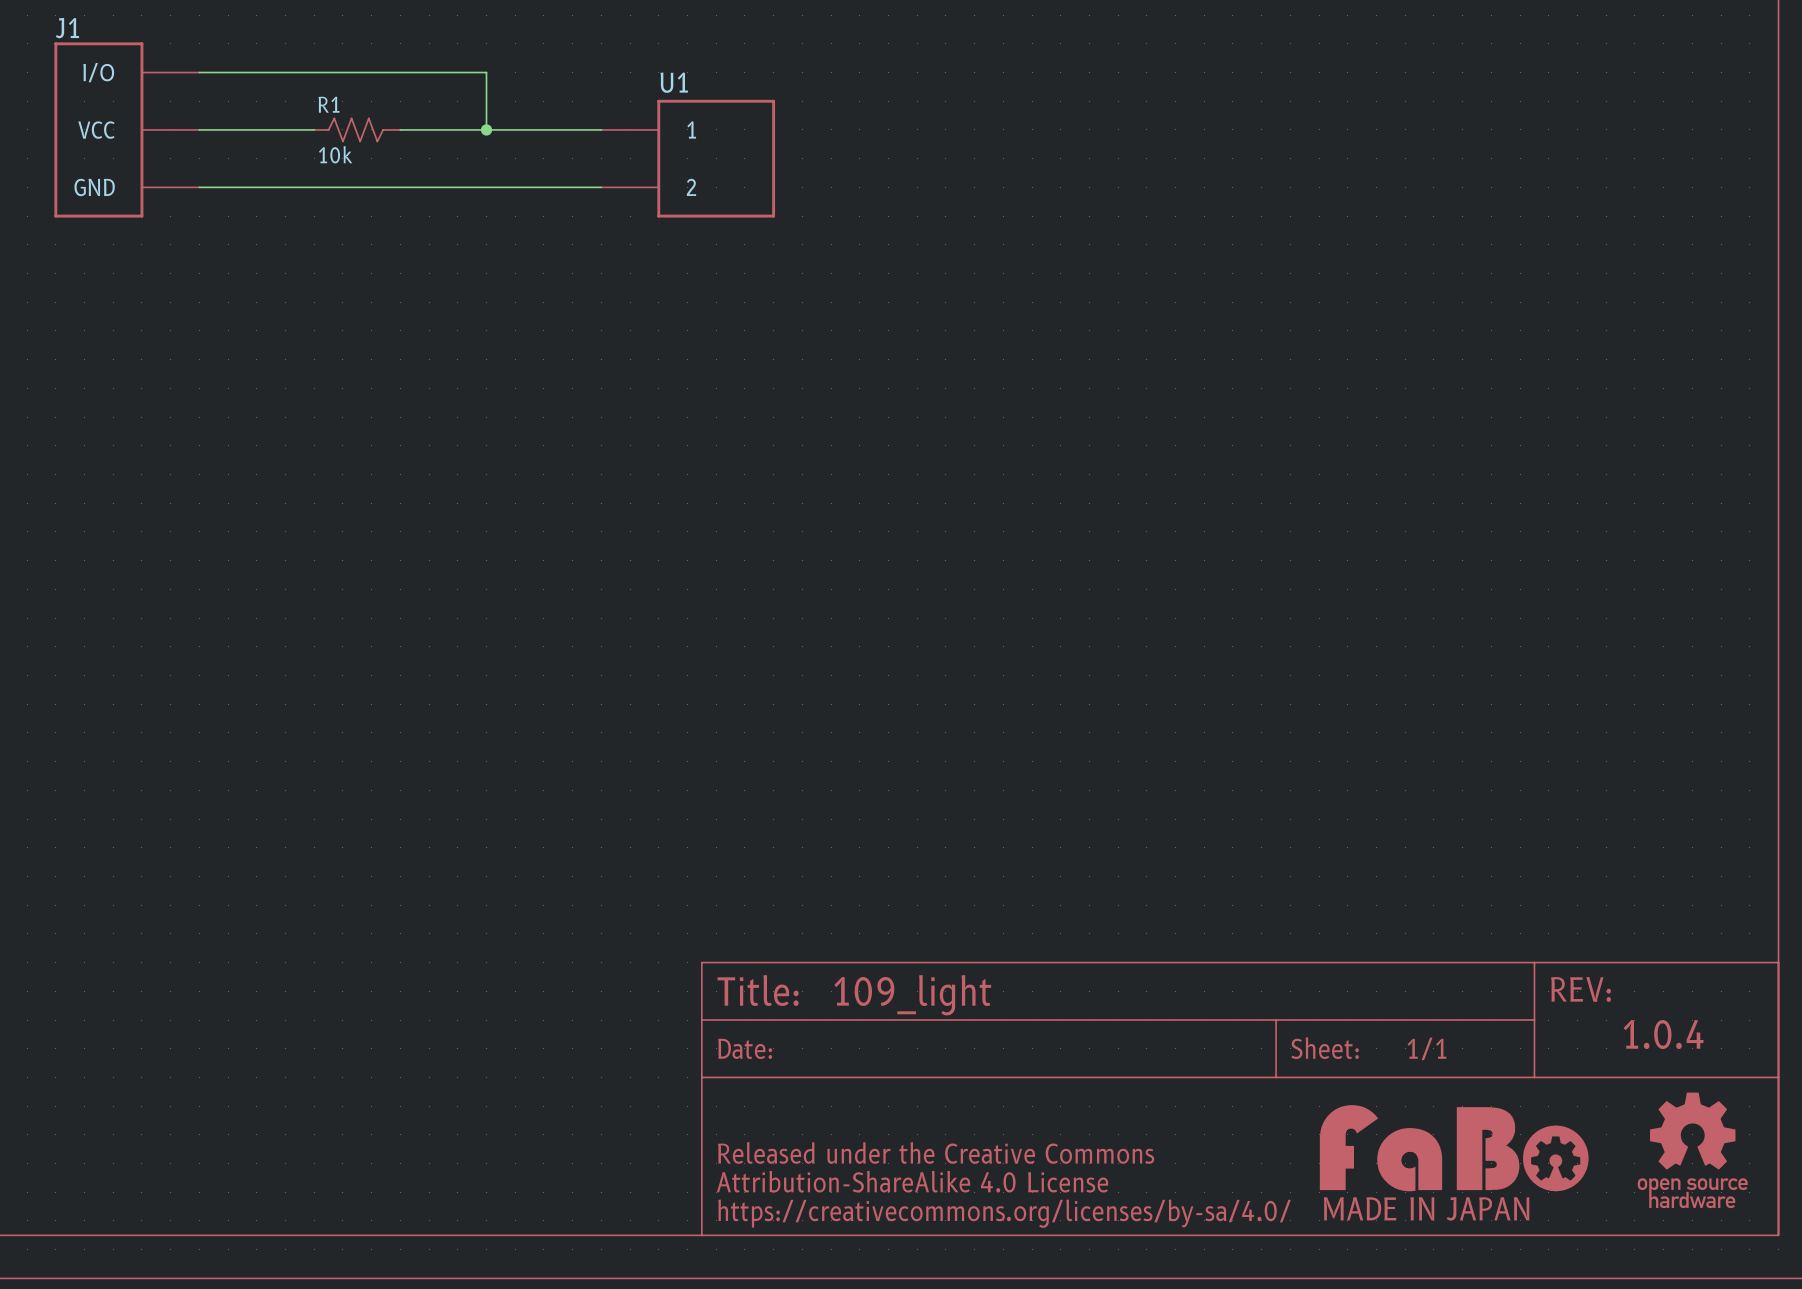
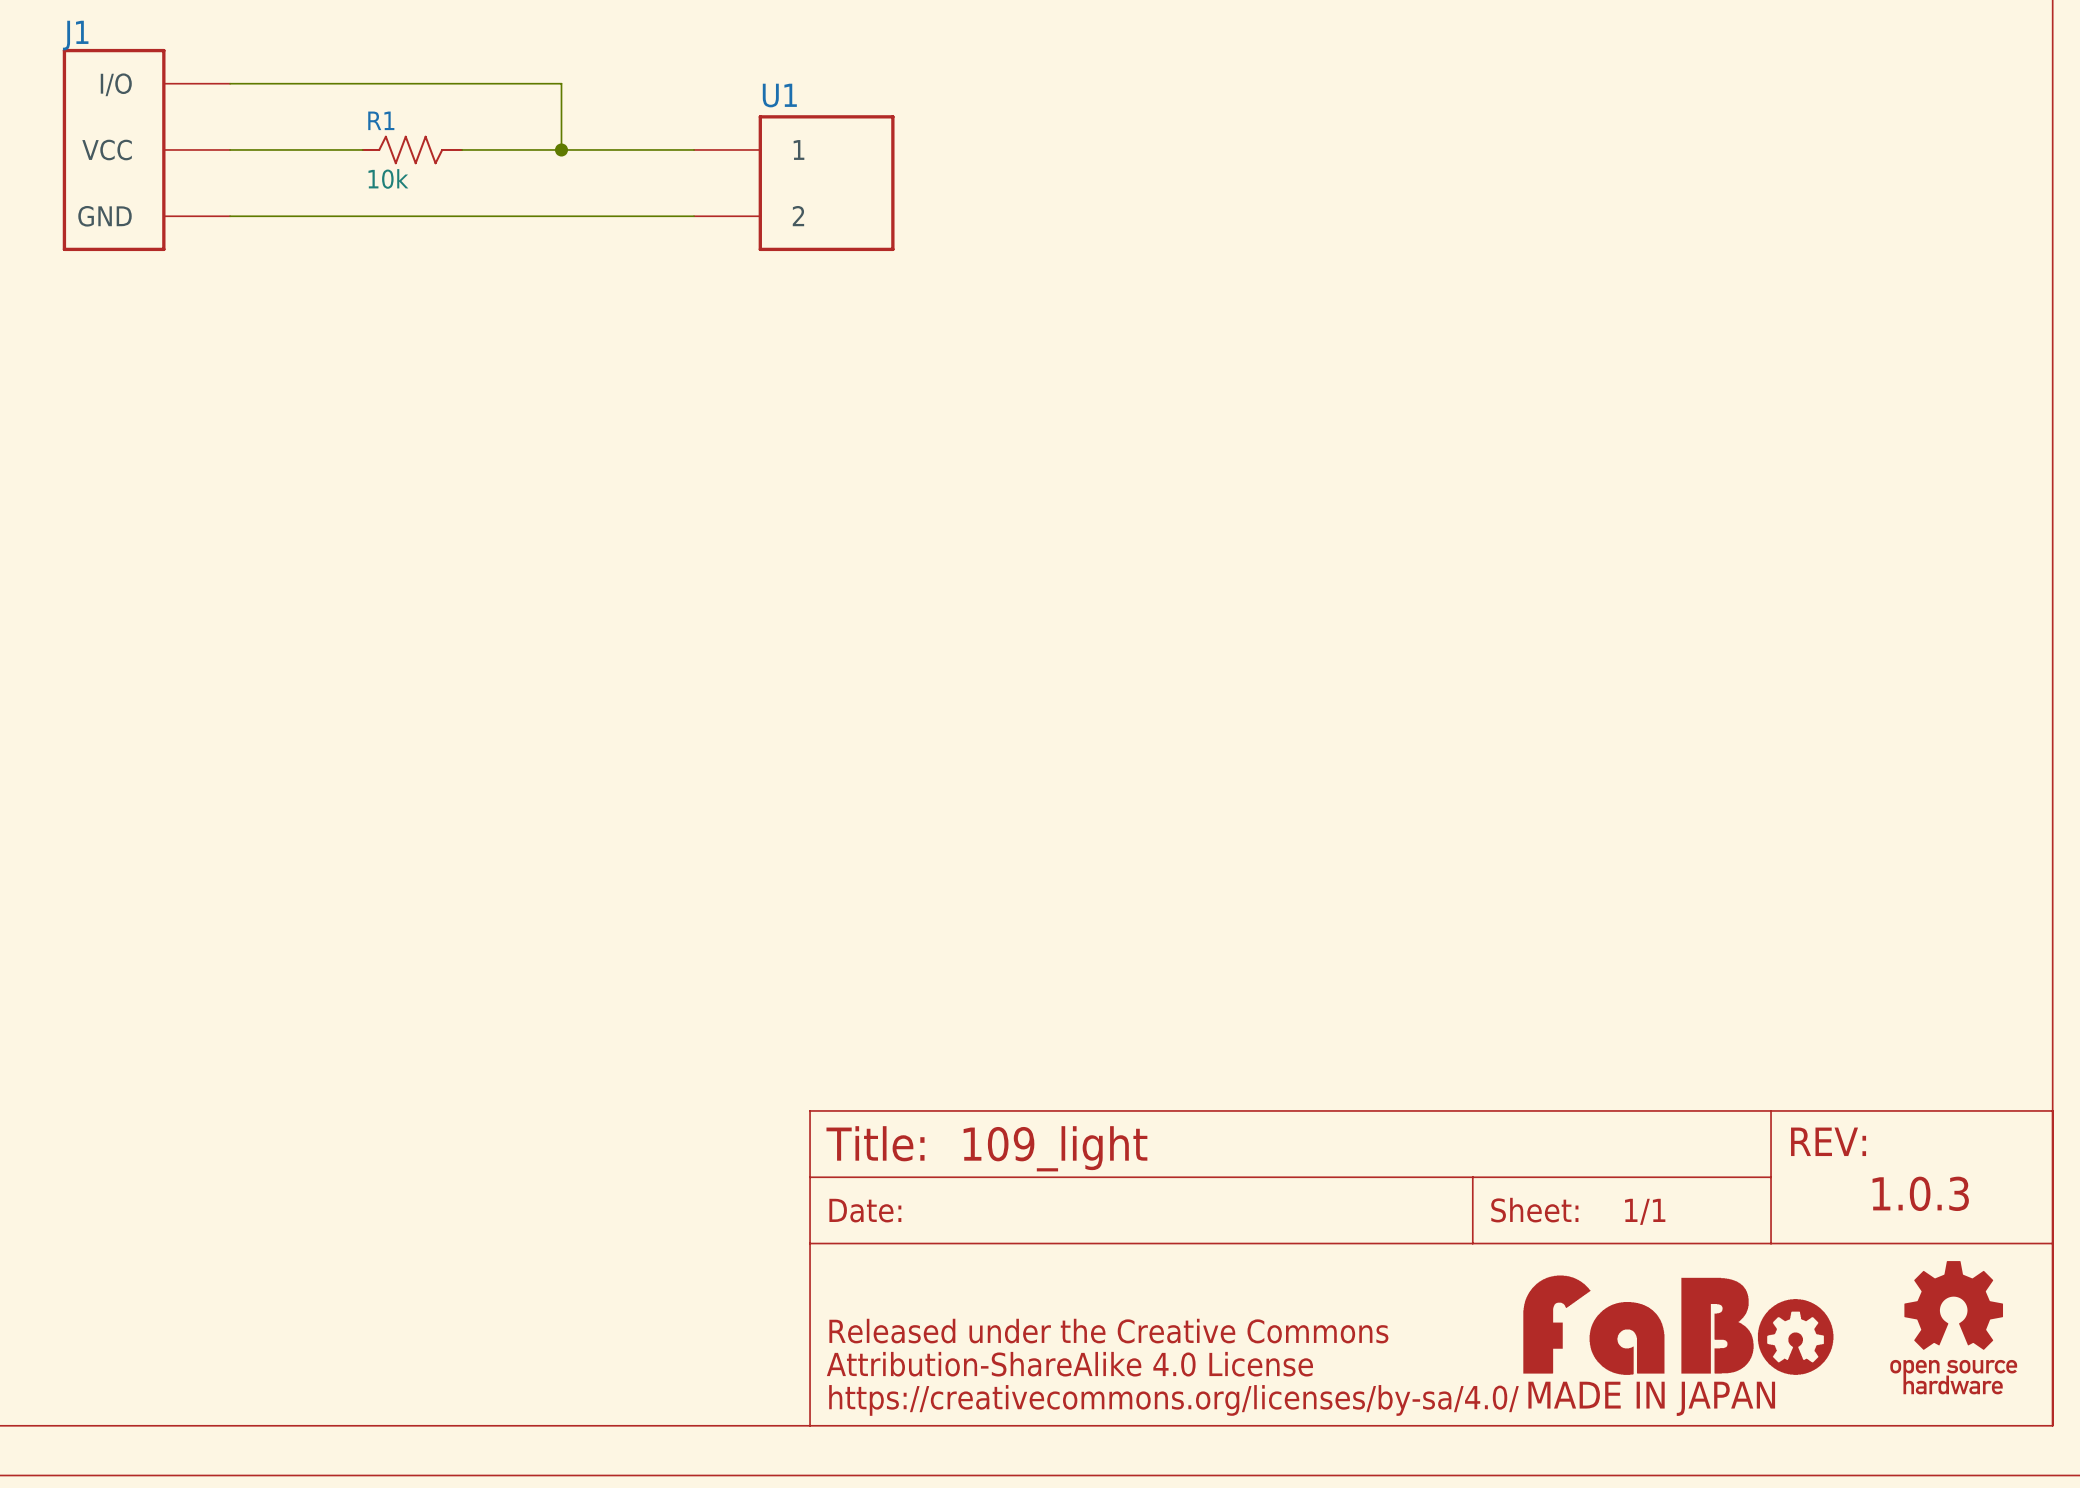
text: 1.0.4 (1663, 1034) -> 1.0.3 (1920, 1193)

